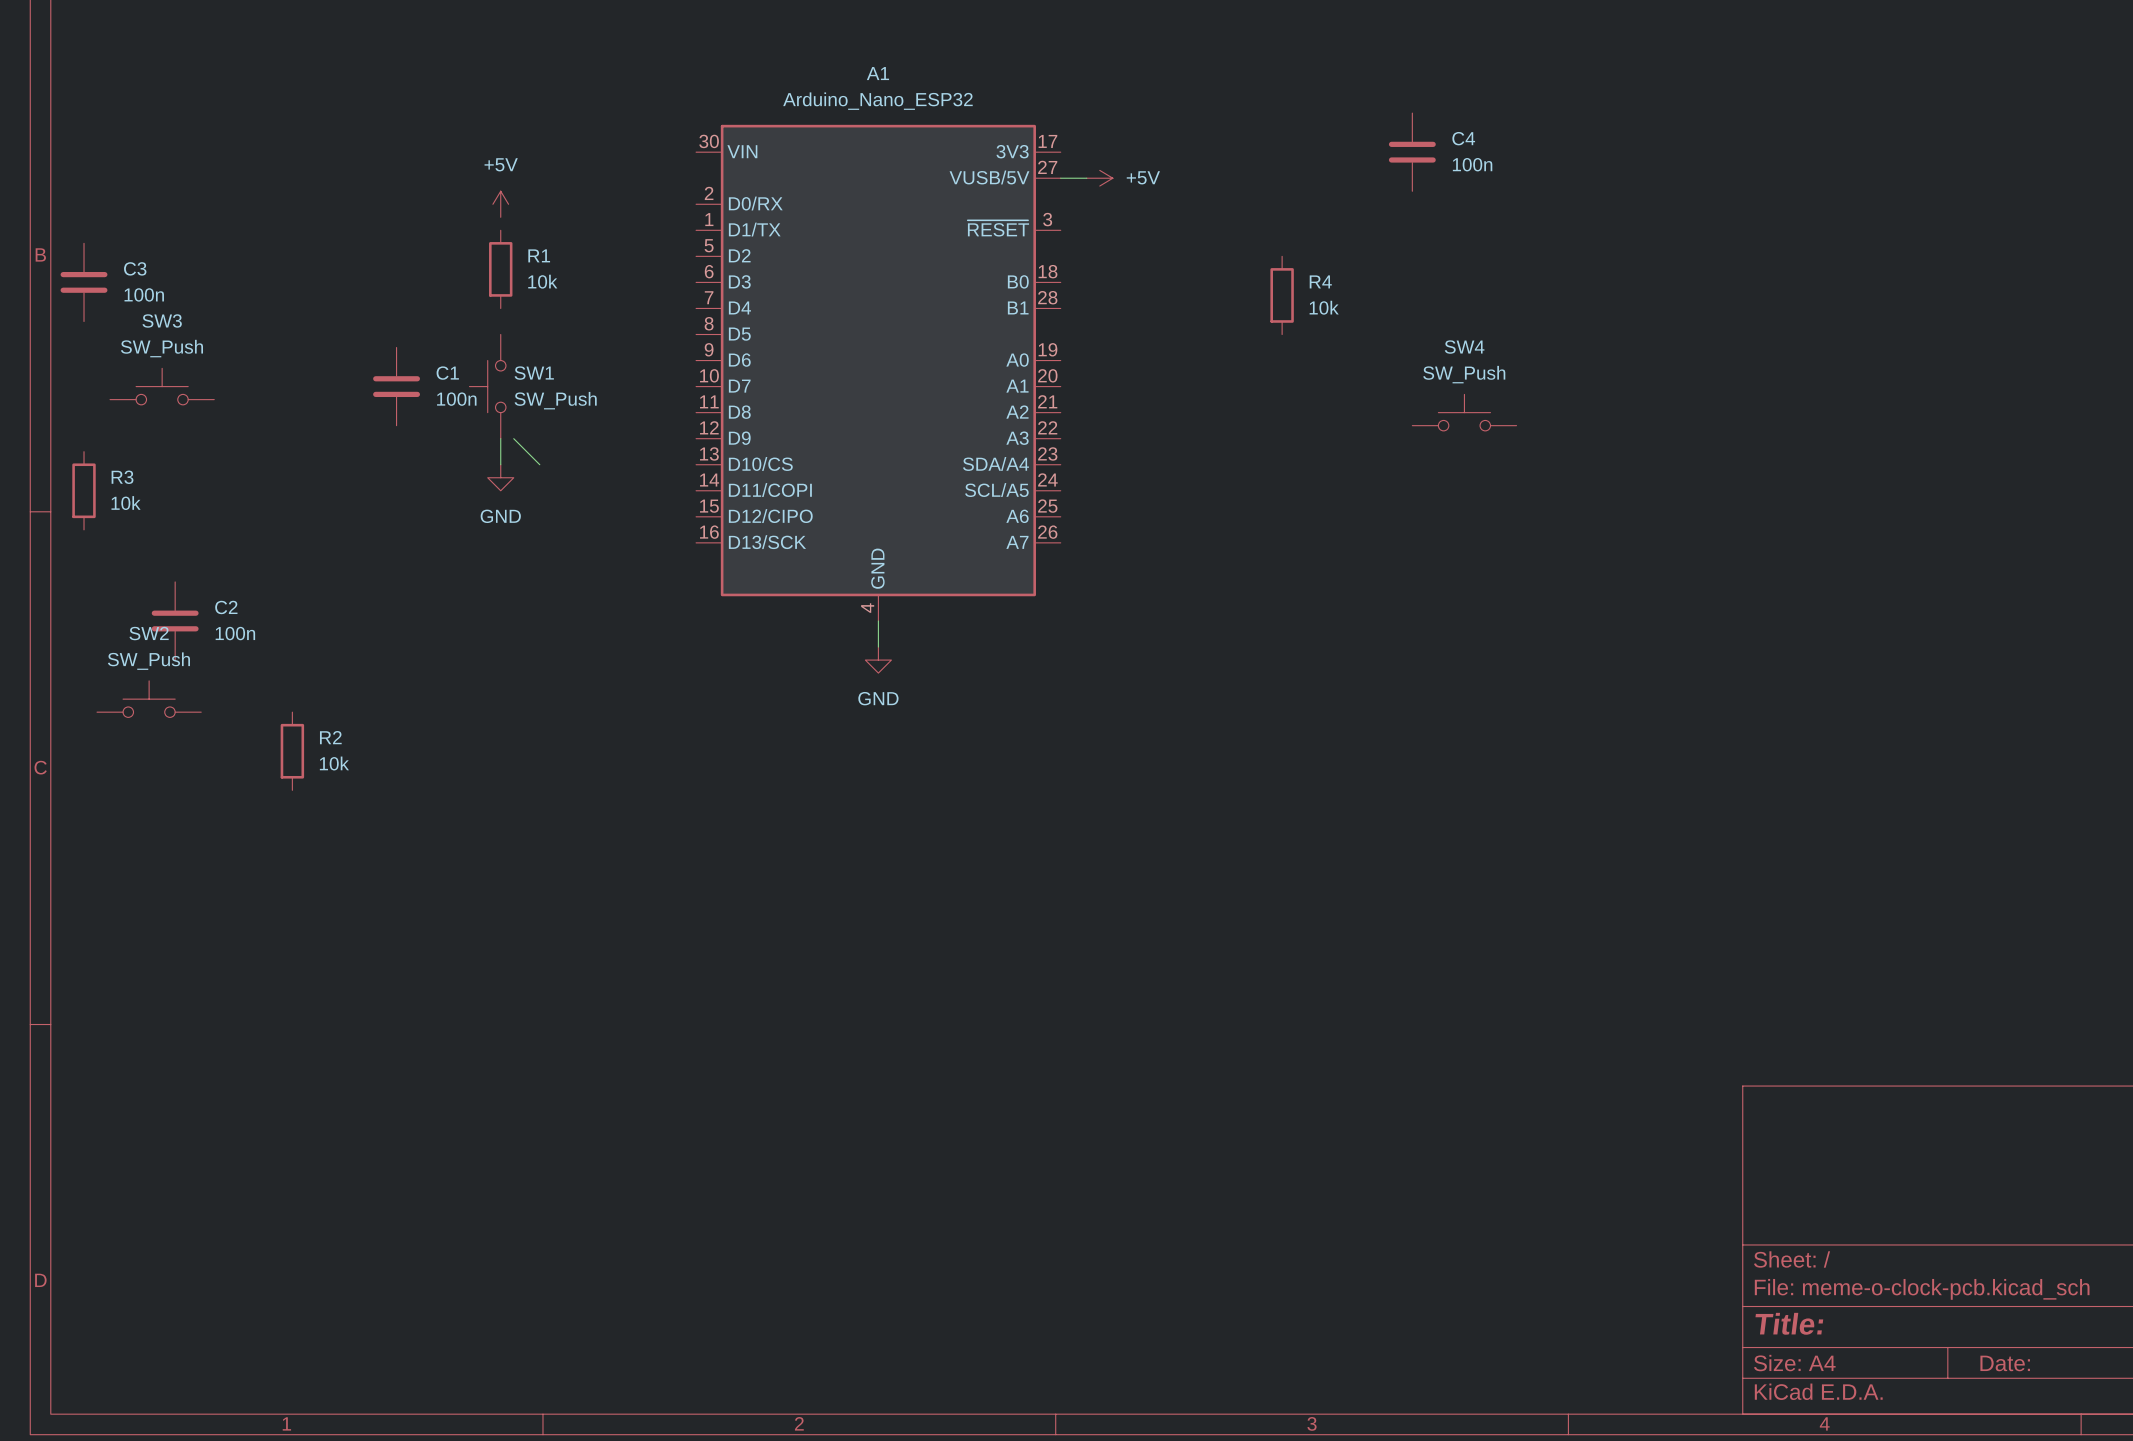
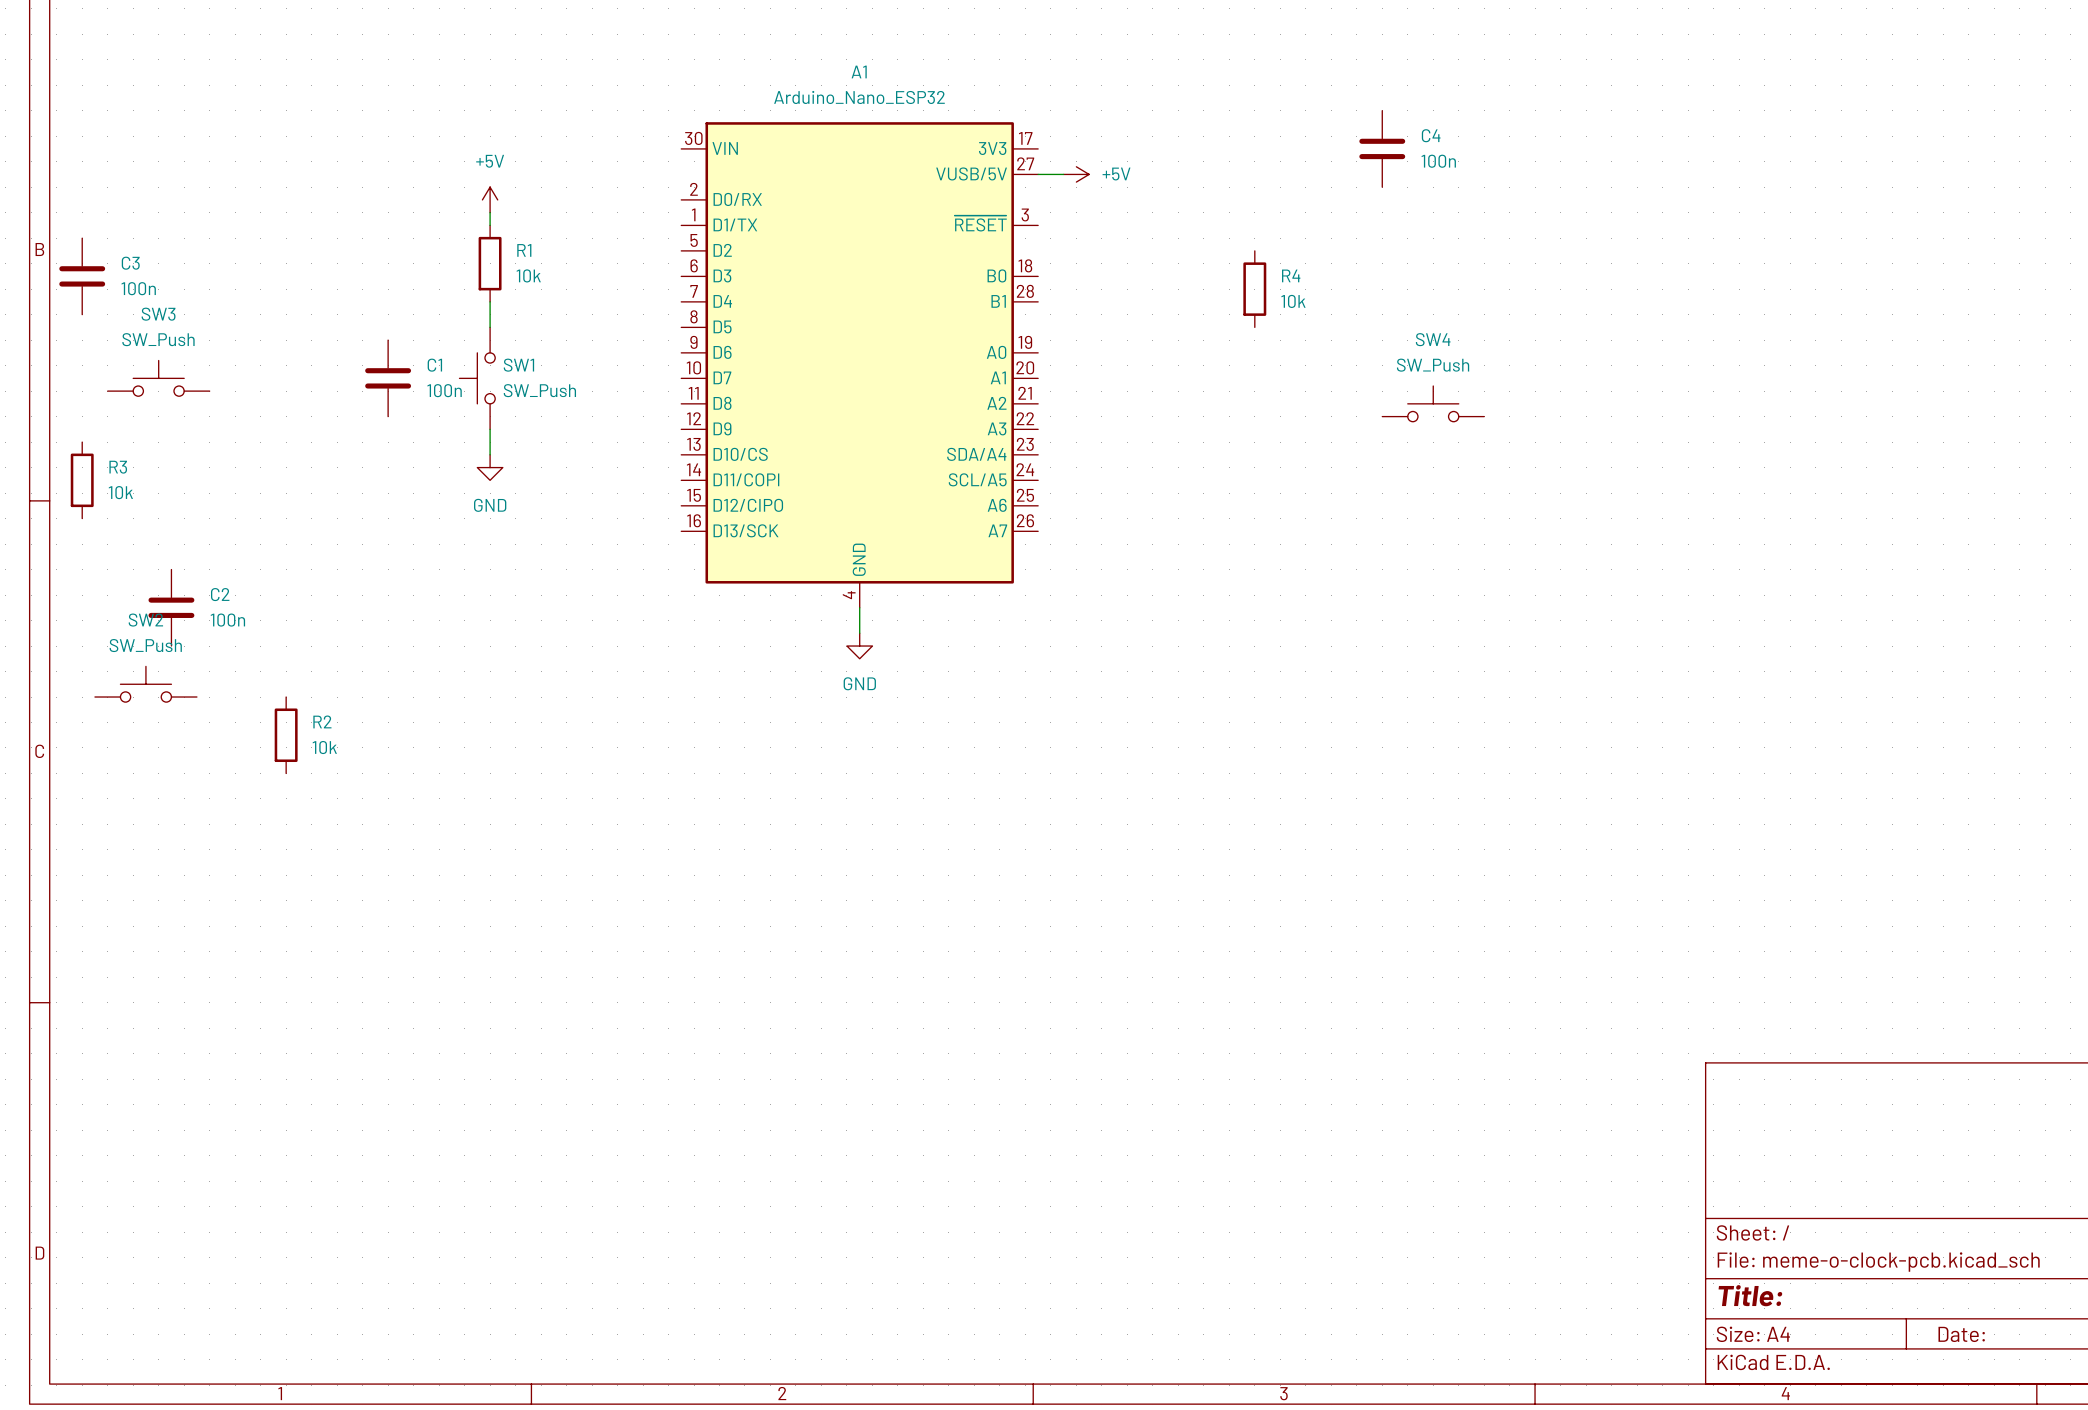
wire: none -> (490, 212) (490, 225)
wire: none -> (490, 301) (490, 327)
wire: (513, 438) (539, 464) -> none

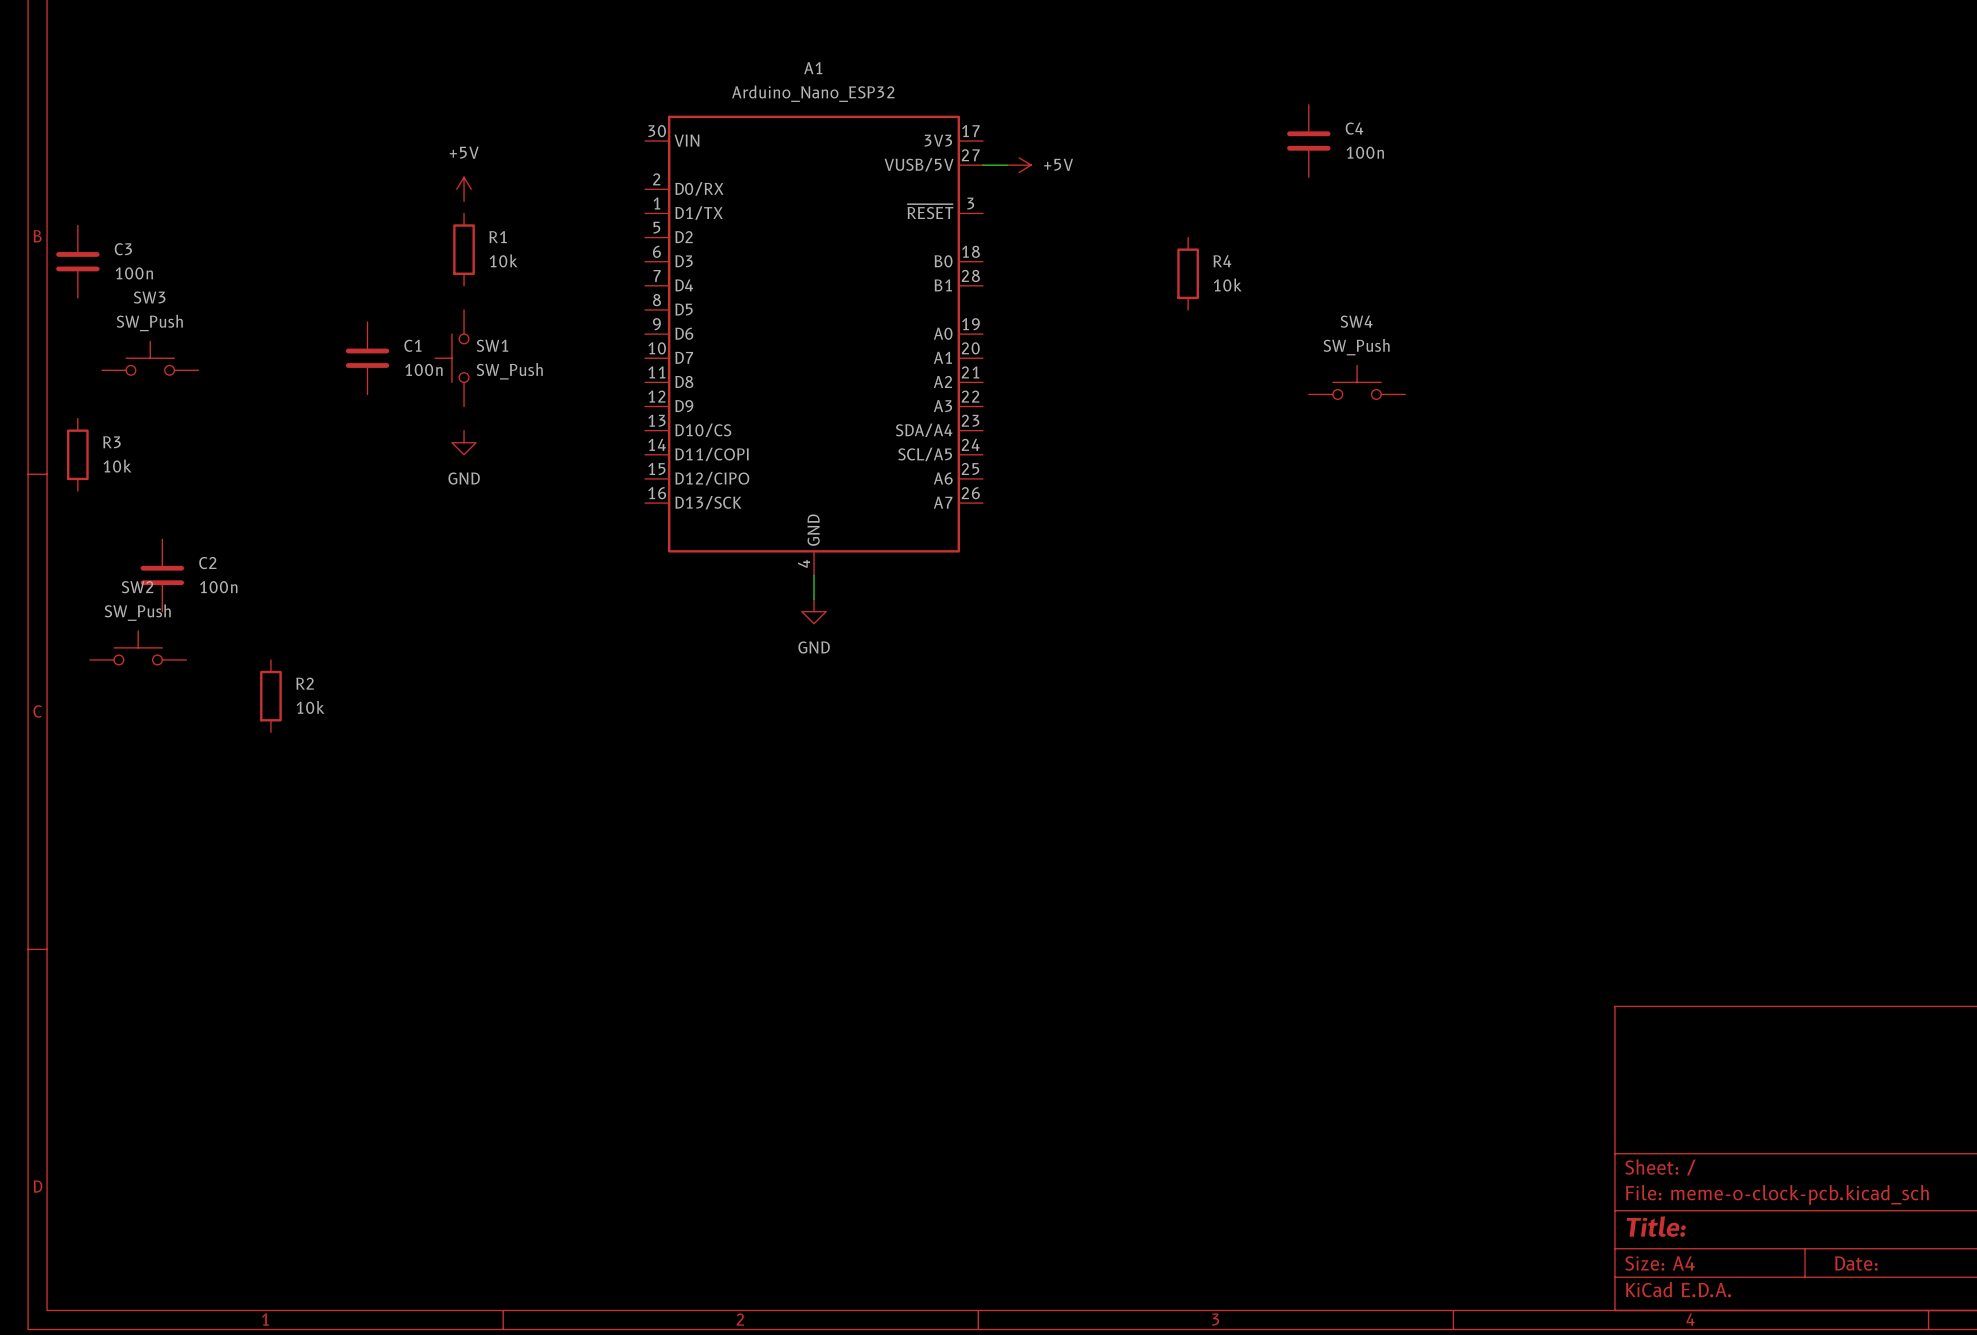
wire: (490, 212) (490, 225) -> none
wire: (490, 301) (490, 327) -> none
wire: (490, 429) (490, 454) -> none

